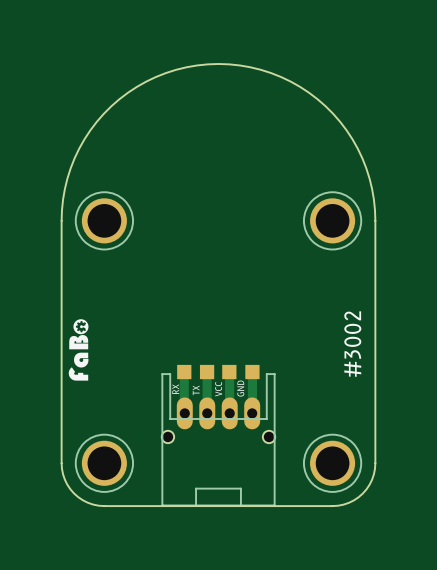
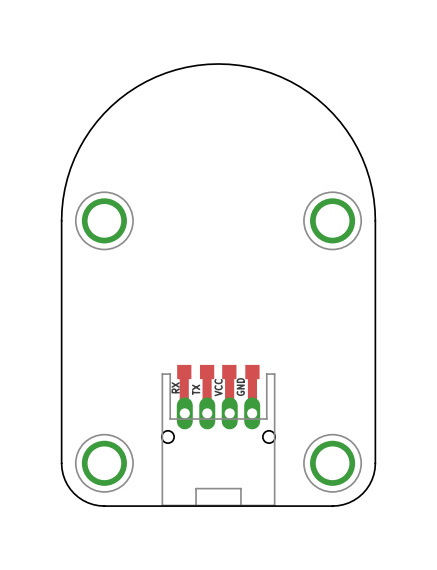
drawing: [68, 319, 89, 381] -> none
text: #3002 (352, 344) -> none

